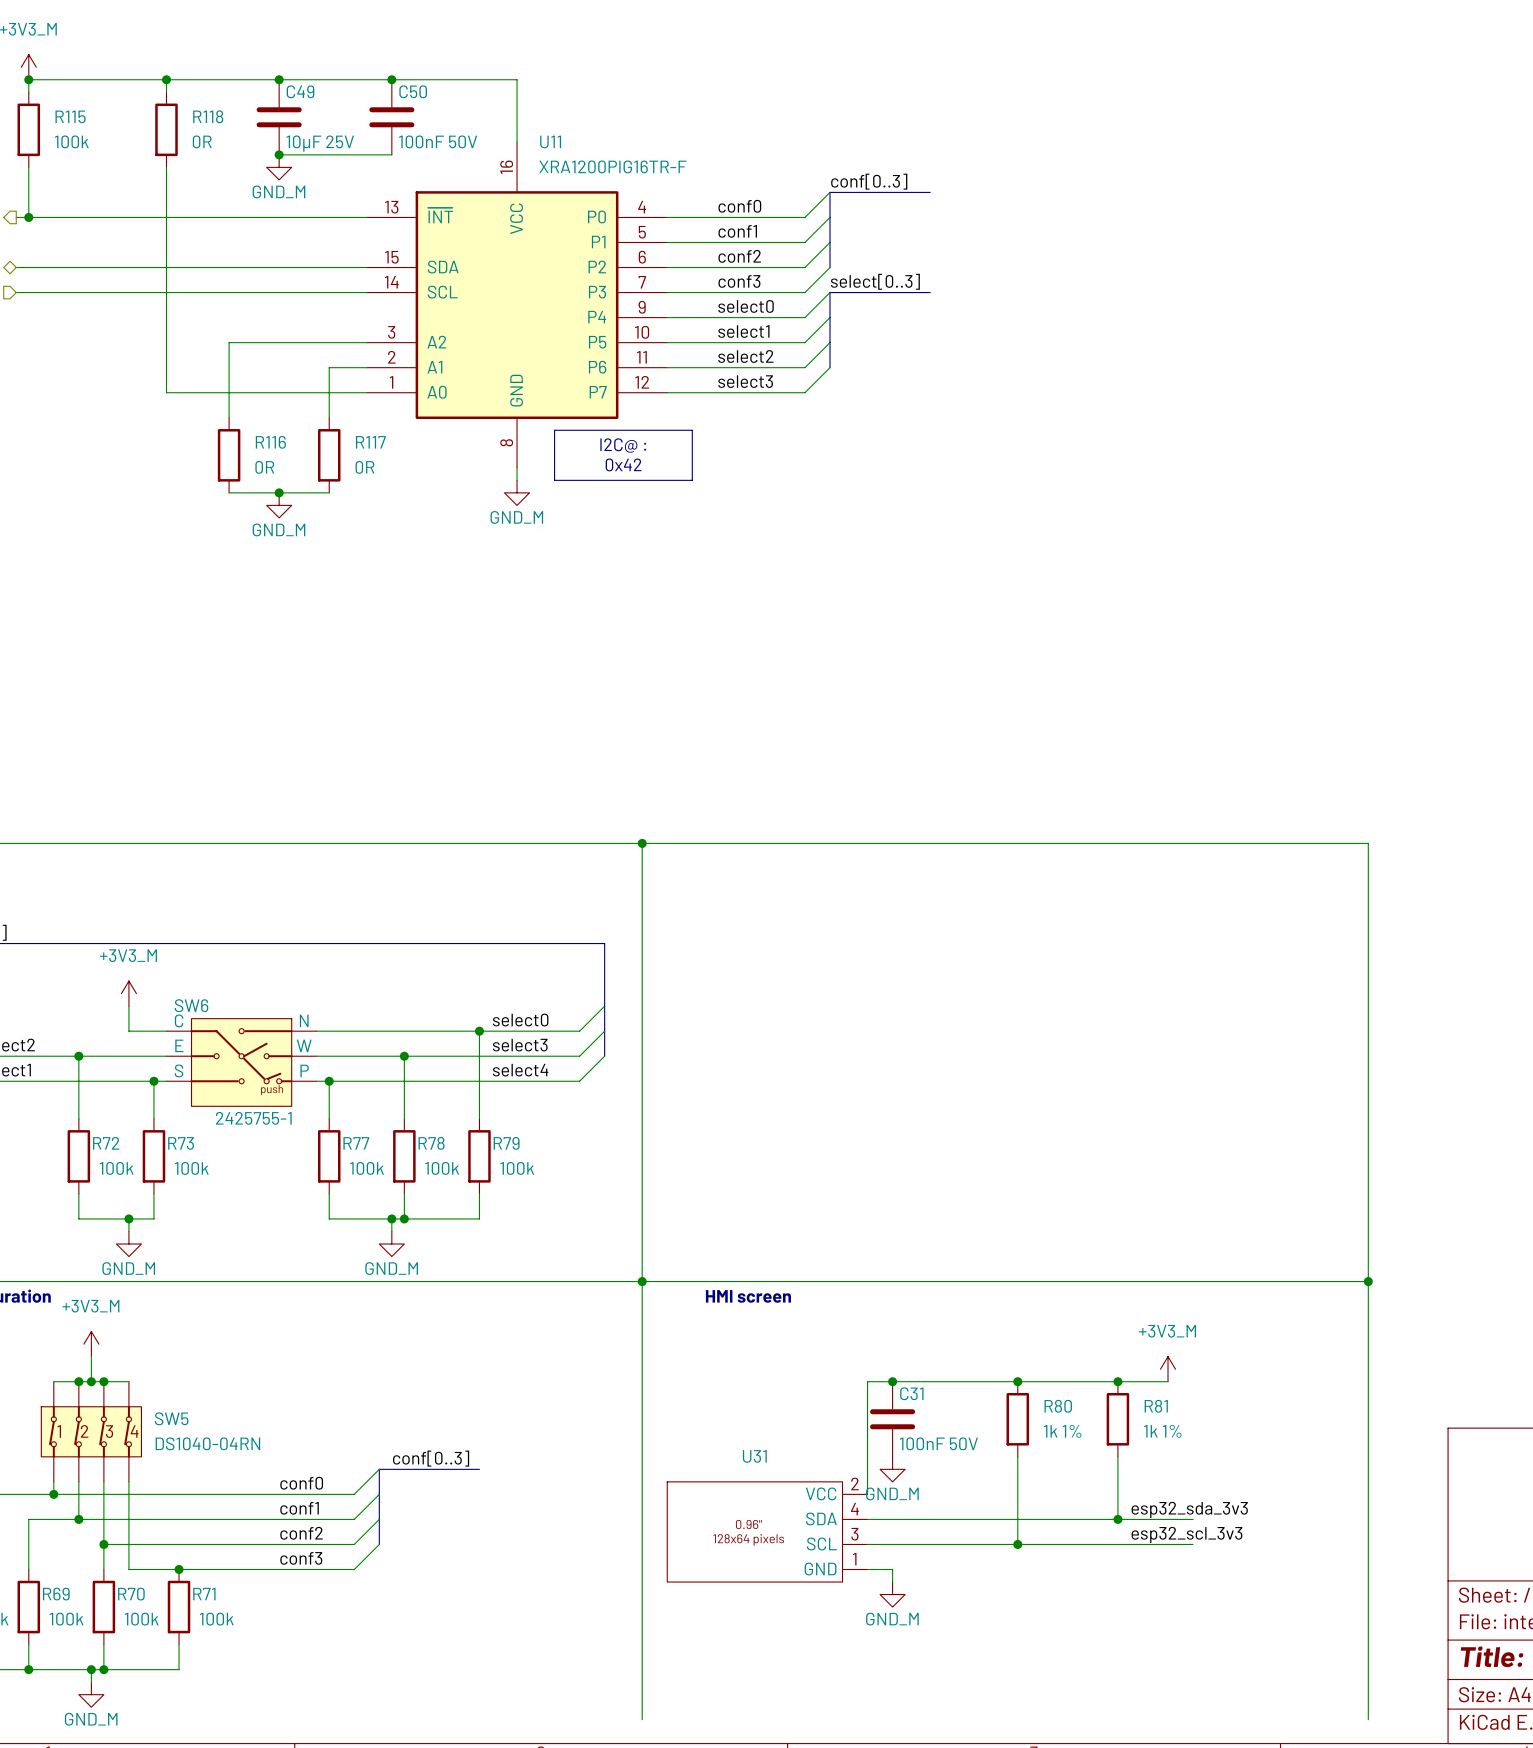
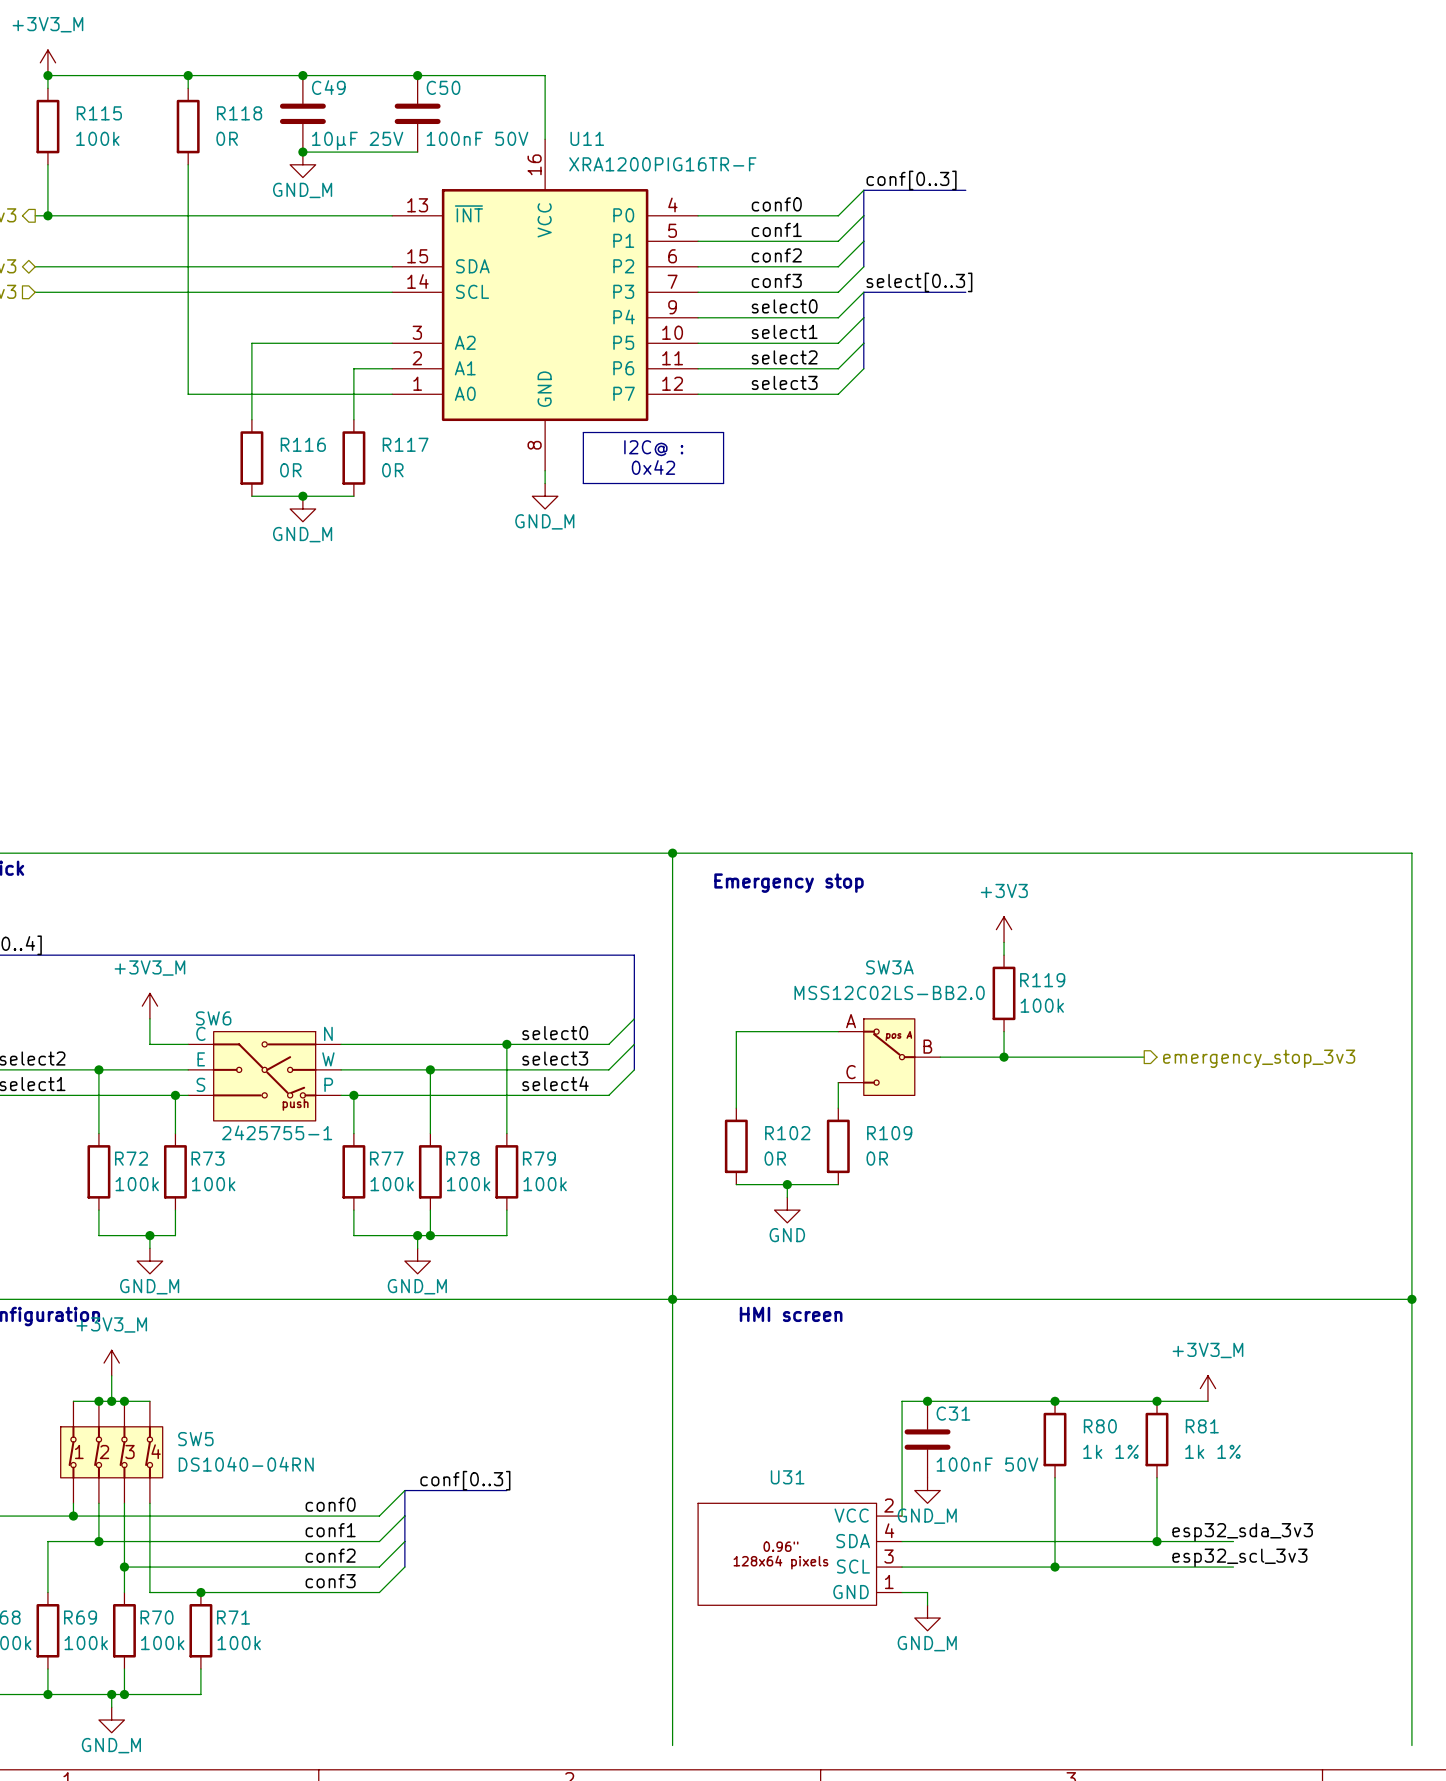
text: none -> Emergency stop (788, 883)
power symbol: none -> +3V3 (1004, 929)
wire: none -> (1004, 942) (1004, 955)
R119: none -> 100k (1004, 993)
wire: none -> (838, 1031) (736, 1031) (736, 1108)
wire: none -> (1004, 1031) (1004, 1057)
SW3A: none -> MSS12C02LS-BB2.0 (889, 1057)
wire: none -> (940, 1057) (1144, 1057)
junction: none -> (1004, 1057)
hierarchical label: none -> emergency_stop_3v3 (1259, 1058)
wire: none -> (838, 1082) (838, 1108)
R102: none -> 0R (736, 1146)
R109: none -> 0R (838, 1146)
wire: none -> (736, 1184) (838, 1184)
wire: none -> (787, 1184) (787, 1197)
junction: none -> (787, 1184)
power symbol: none -> GND (787, 1210)

